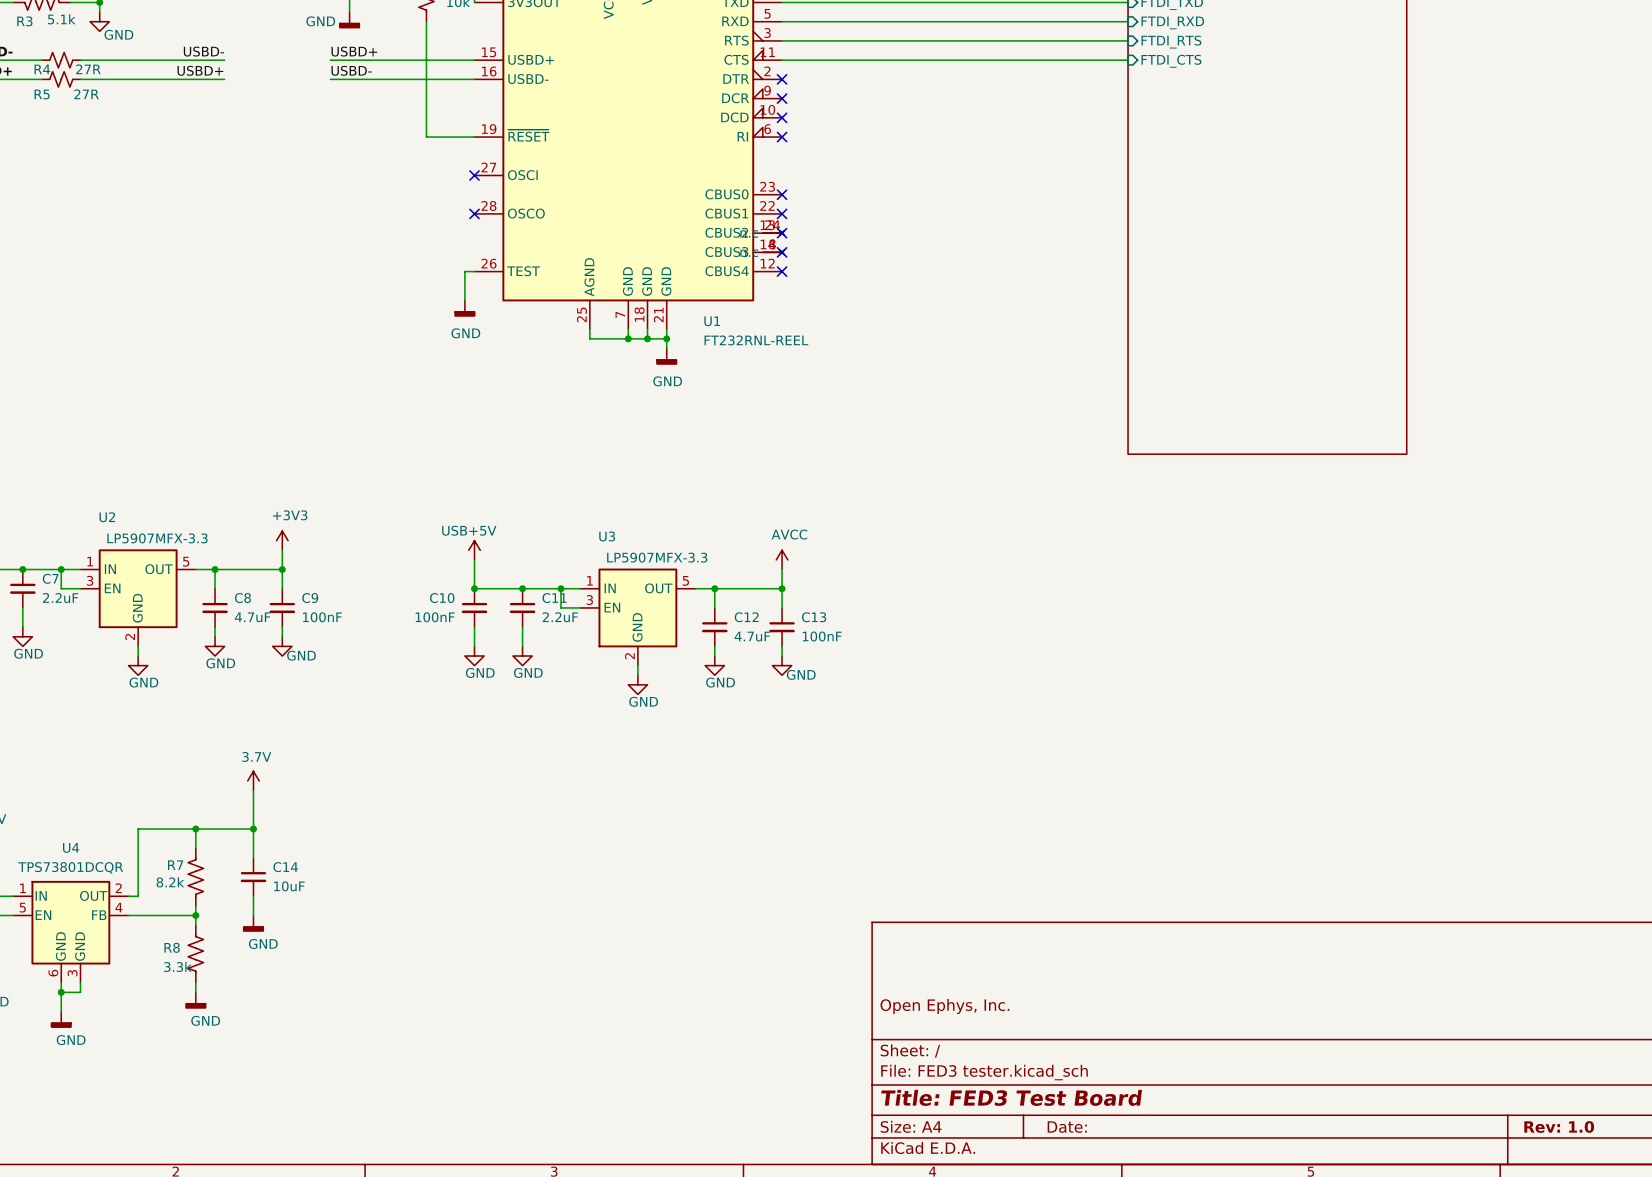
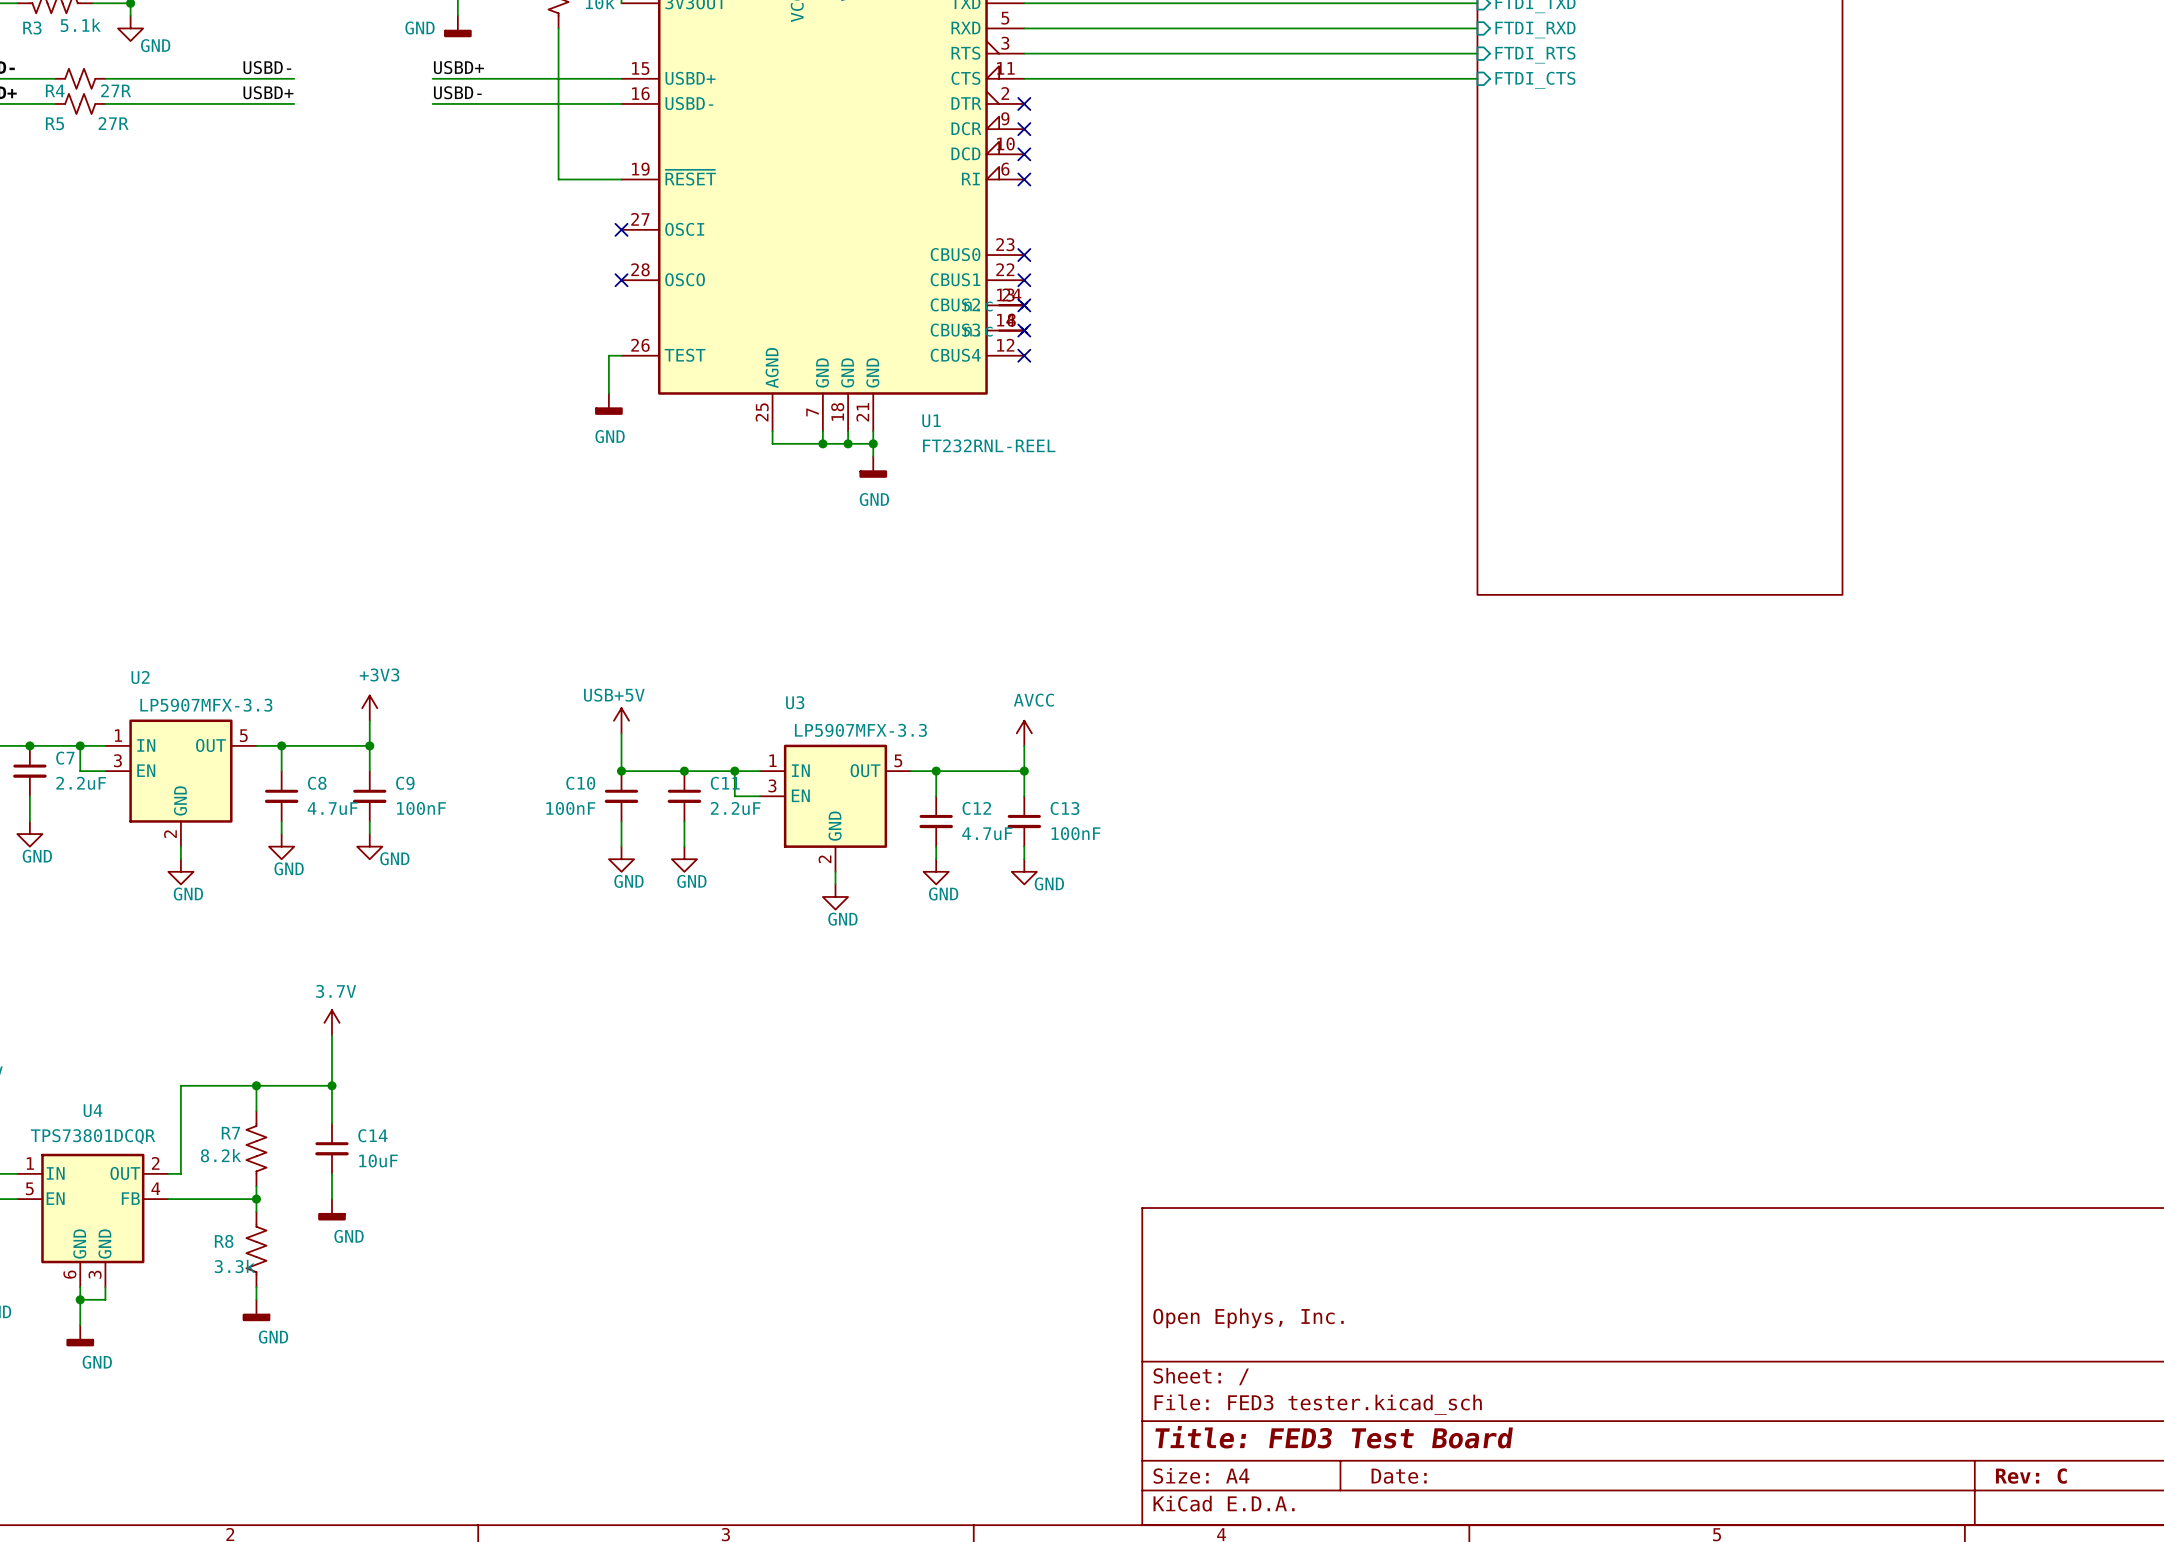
title block: Rev: 1.0 (1559, 1126) -> Rev: C (2031, 1476)

